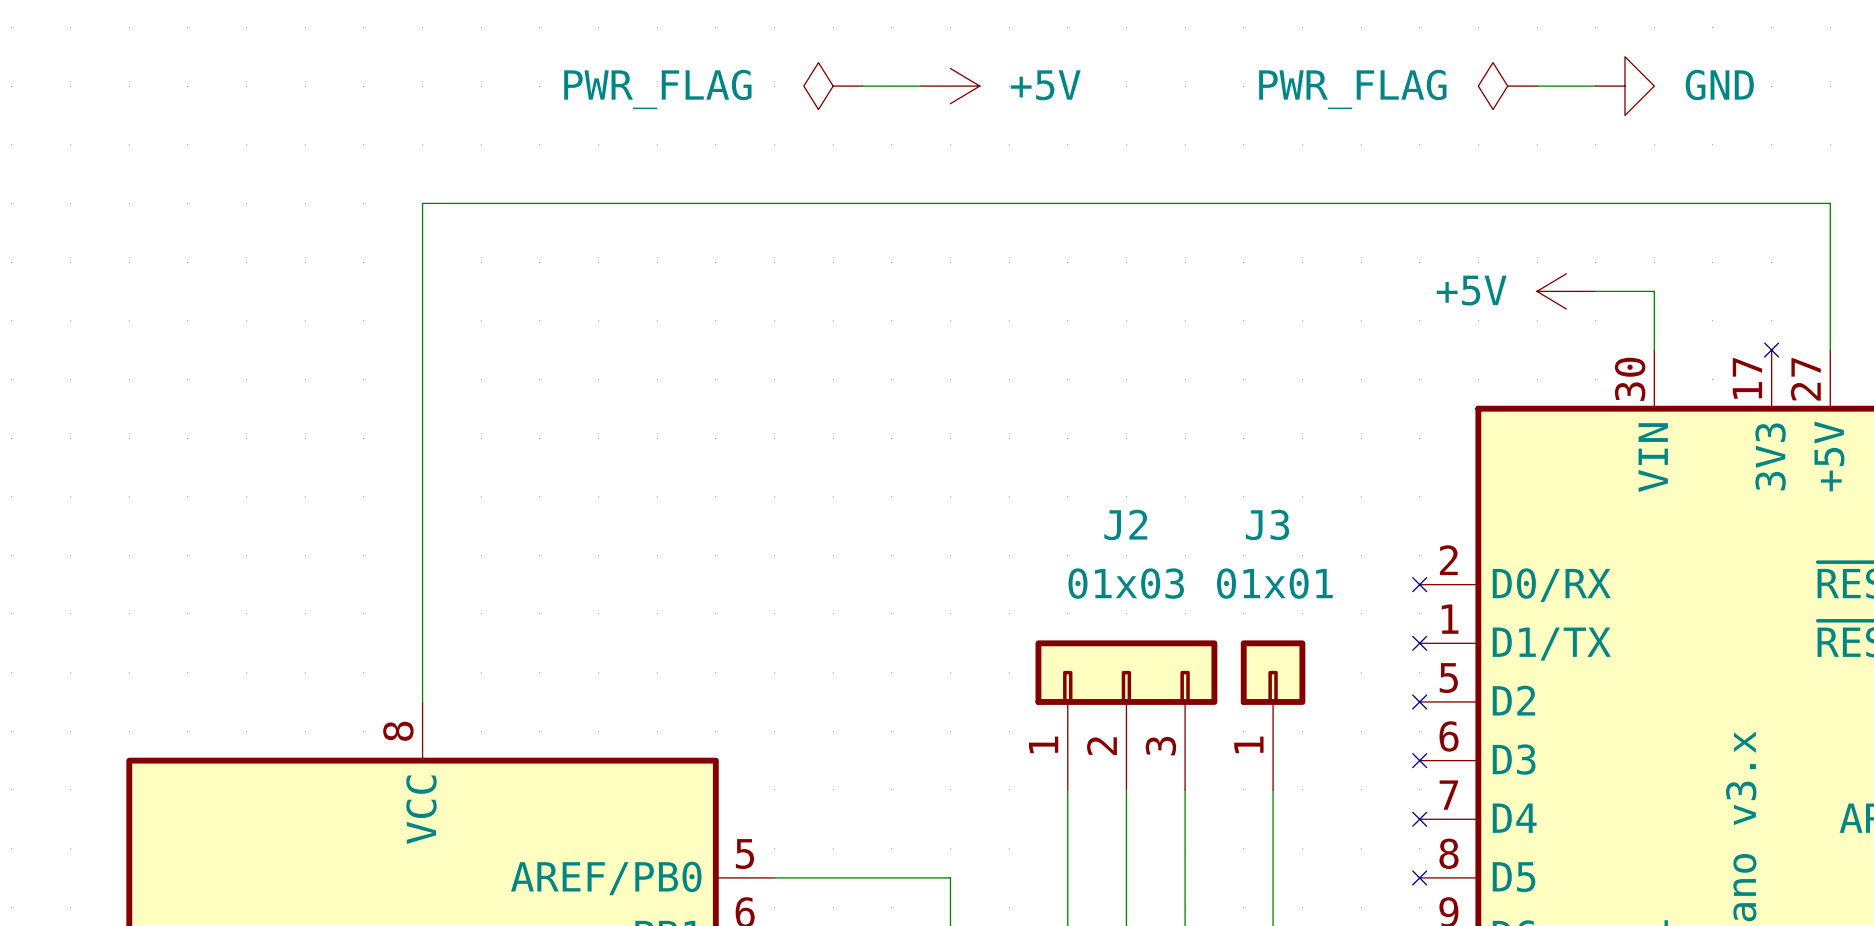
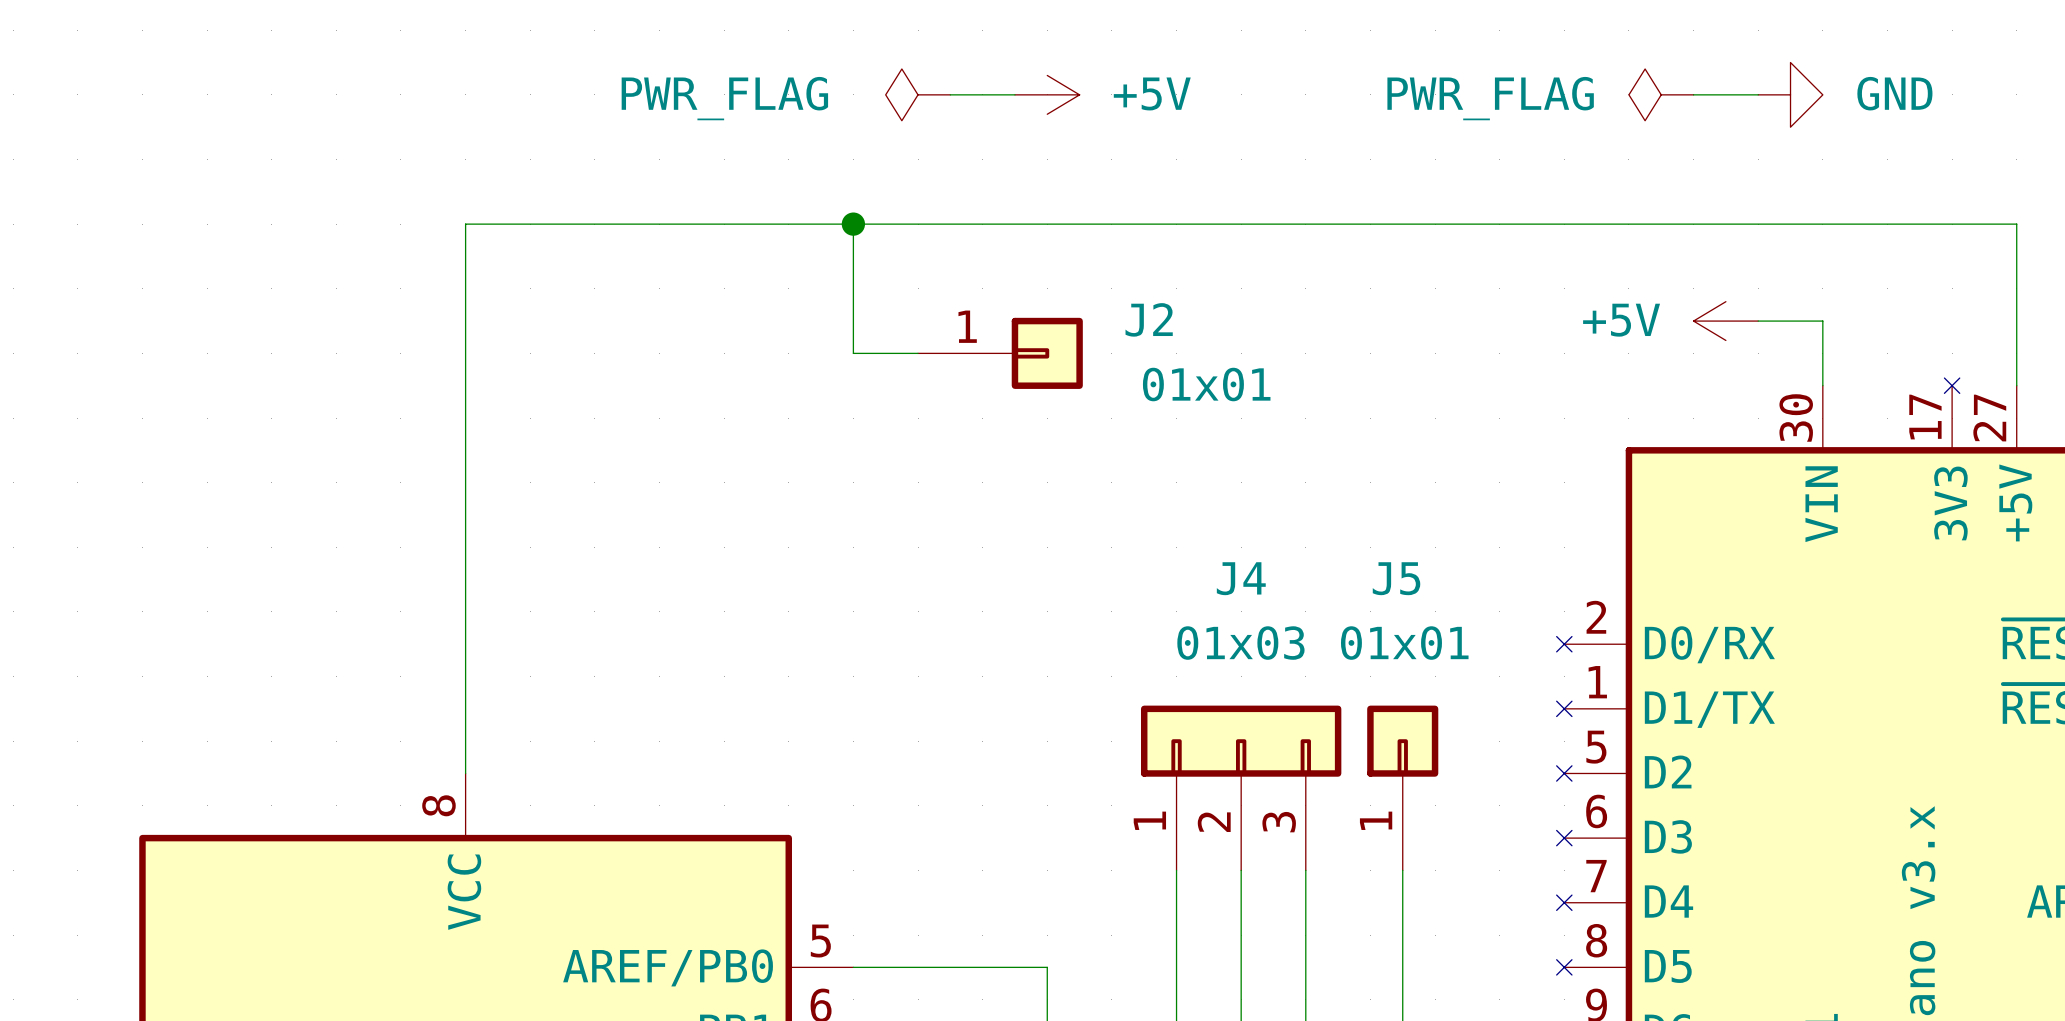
wire: none -> (853, 224) (853, 353) (918, 353)
junction: none -> (853, 224)
J2: none -> 01x01 (1000, 353)
J2 name: J2 (1125, 524) -> J4 (1241, 578)
J3 name: J3 (1267, 524) -> J5 (1396, 578)

